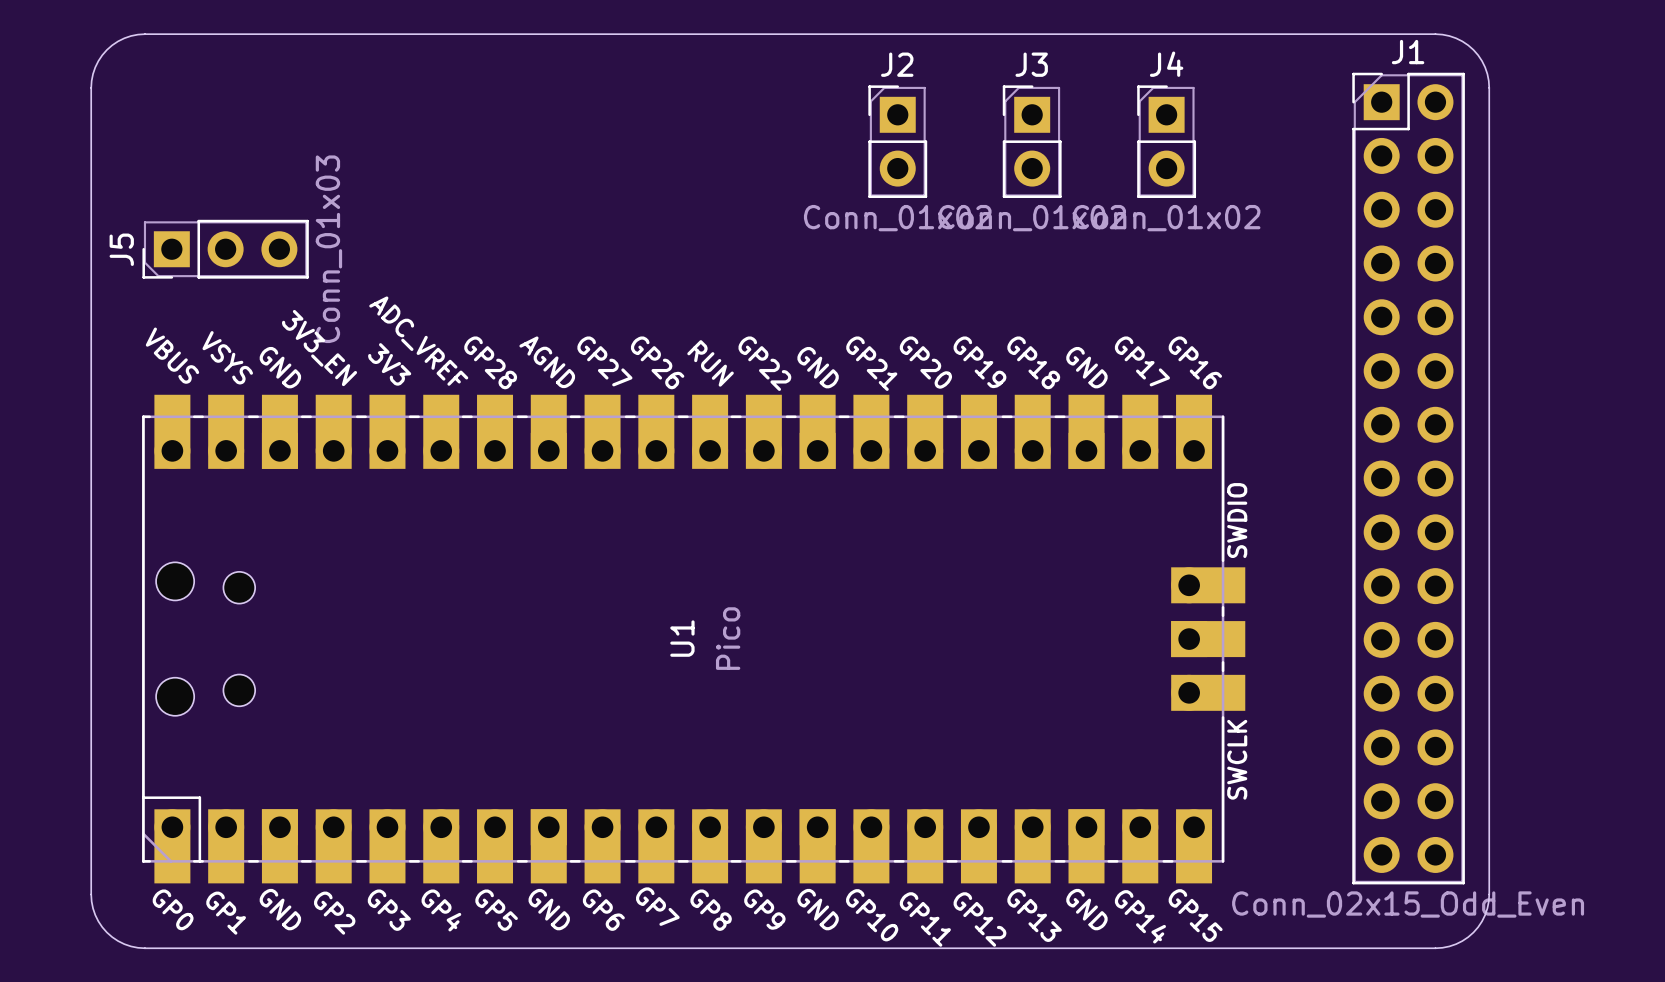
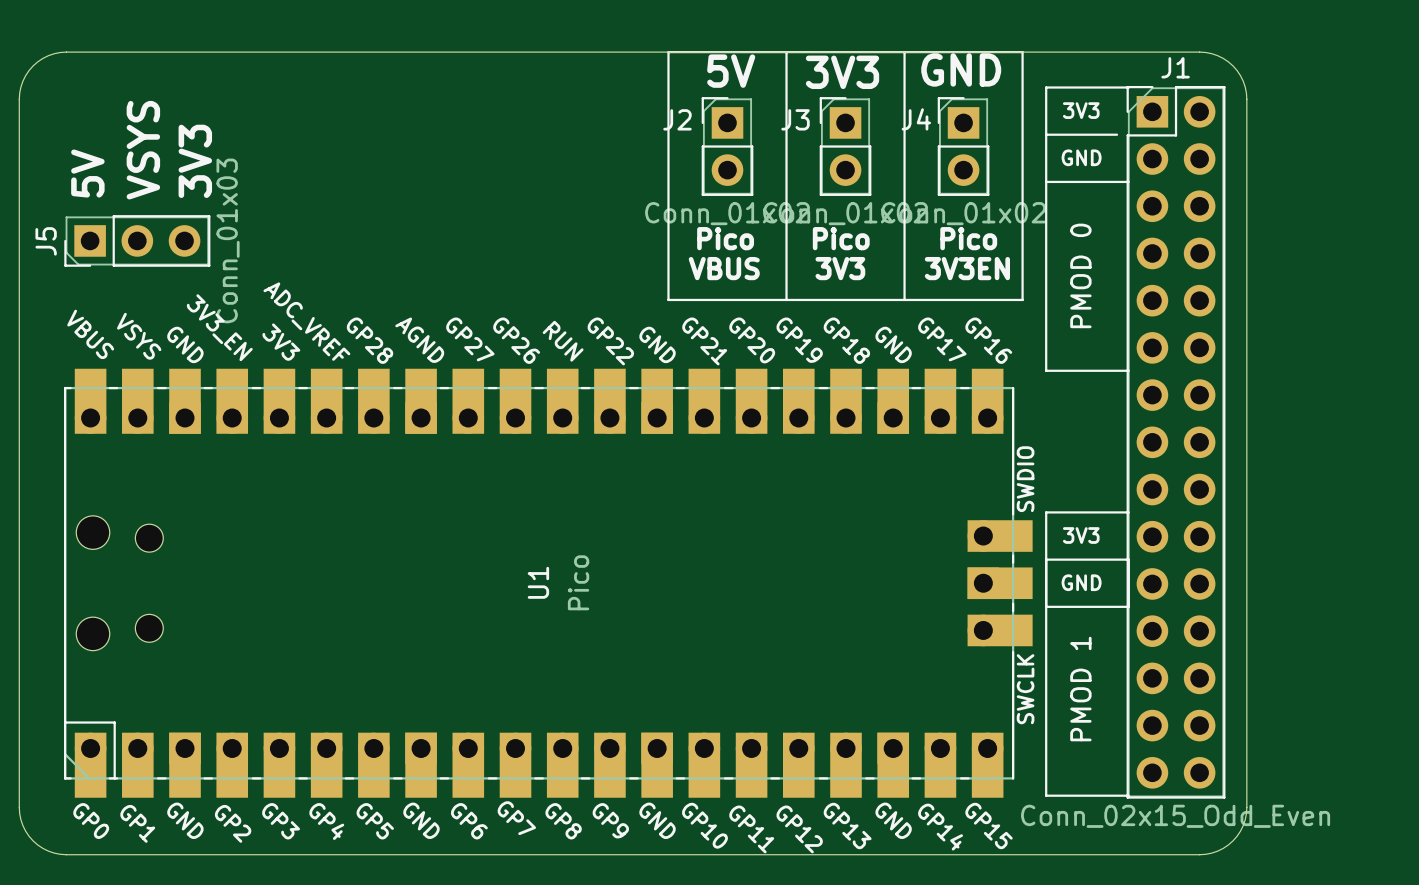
line: none -> (668, 52) (1022, 52) (1022, 299) (668, 299) (668, 52)
line: none -> (786, 52) (786, 299)
line: none -> (904, 52) (904, 299)
text: none -> GND (961, 69)
text: none -> 5V (731, 71)
text: none -> 3V3 (842, 72)
J2 name position: J2 (897, 64) -> J2 (677, 119)
J3 name position: J3 (1031, 64) -> J3 (795, 119)
J4 name position: J4 (1166, 64) -> J4 (916, 119)
line: none -> (1128, 87) (1046, 87) (1046, 370) (1128, 370)
text: none -> 3V3 (1081, 110)
line: none -> (1046, 134) (1117, 134)
text: none -> VSYS (143, 150)
text: none -> GND (1081, 157)
text: none -> 3V3 (195, 161)
text: none -> 5V (87, 173)
line: none -> (1046, 181) (1128, 181)
text: none -> Pico (725, 238)
text: none -> Pico (841, 238)
text: none -> Pico (968, 238)
text: none -> VBUS (724, 268)
text: none -> 3V3 (840, 268)
text: none -> 3V3EN (967, 268)
text: none -> PMOD 0 (1080, 275)
line: none -> (1128, 512) (1046, 512) (1046, 795) (1128, 795)
text: none -> 3V3 (1081, 535)
line: none -> (1046, 559) (1128, 559) (1128, 606) (1046, 606)
text: none -> GND (1081, 582)
text: none -> PMOD 1 (1080, 689)

